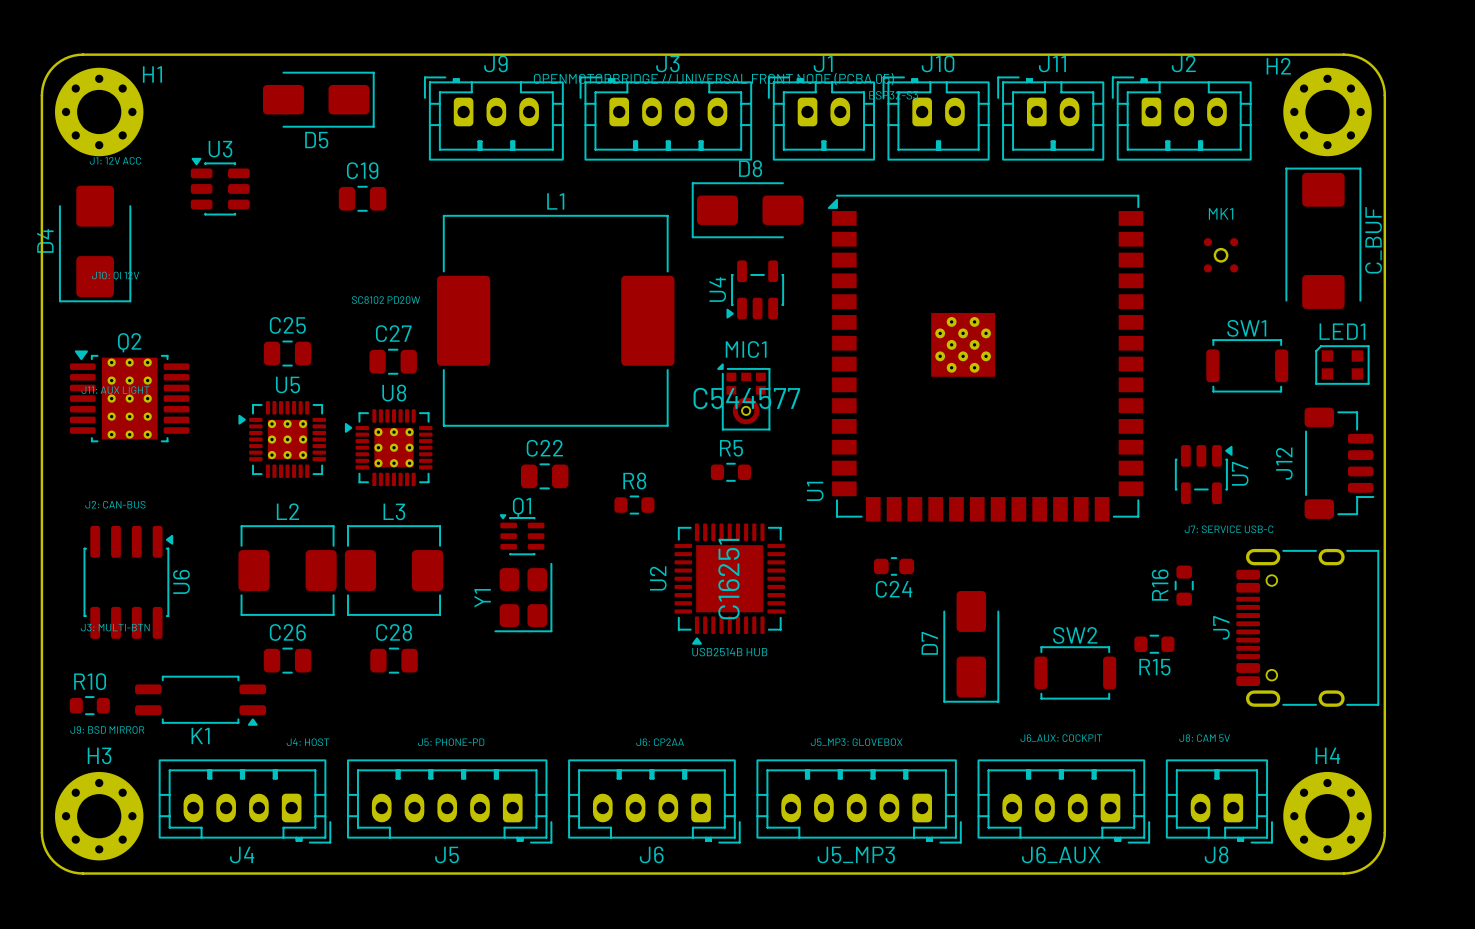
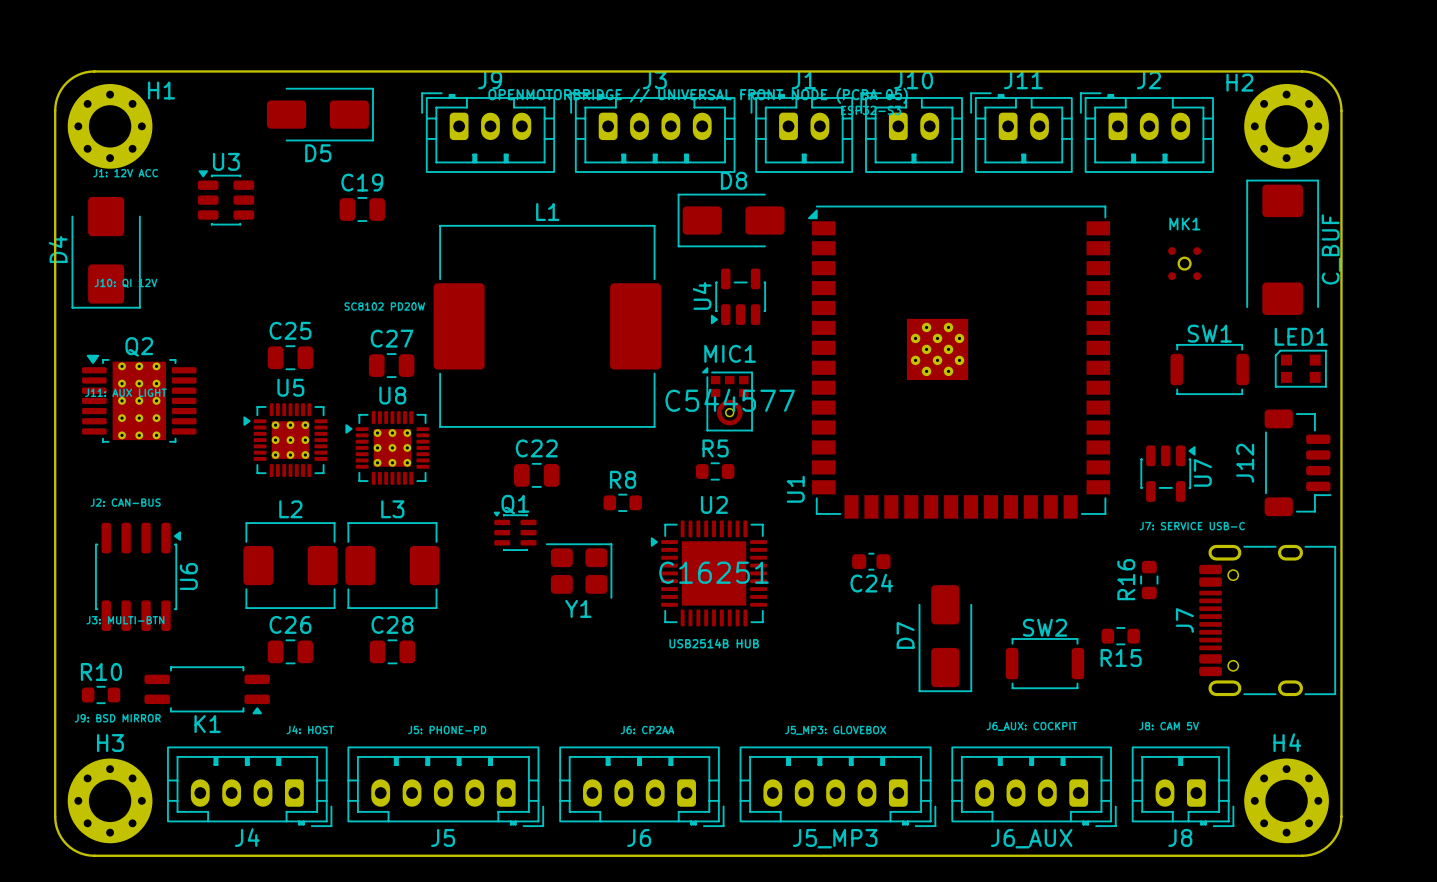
U2 rotation: 0° (729, 584) -> 90° clockwise (708, 573)
Y1 rotation: 0° (523, 597) -> 90° counterclockwise (579, 571)
Y1 position: (523, 597) -> (579, 571)

